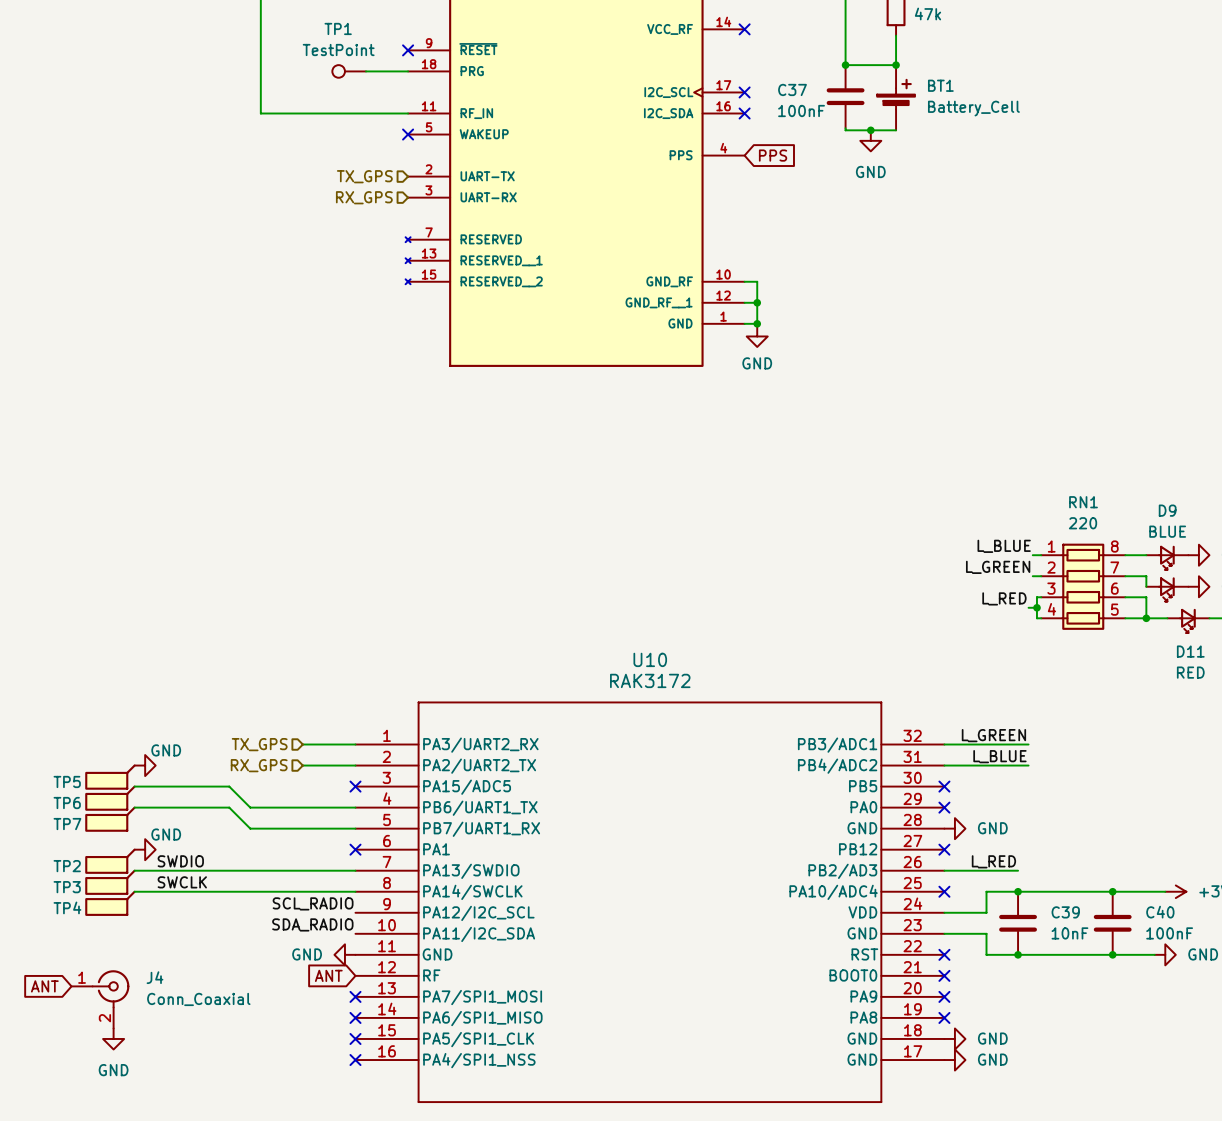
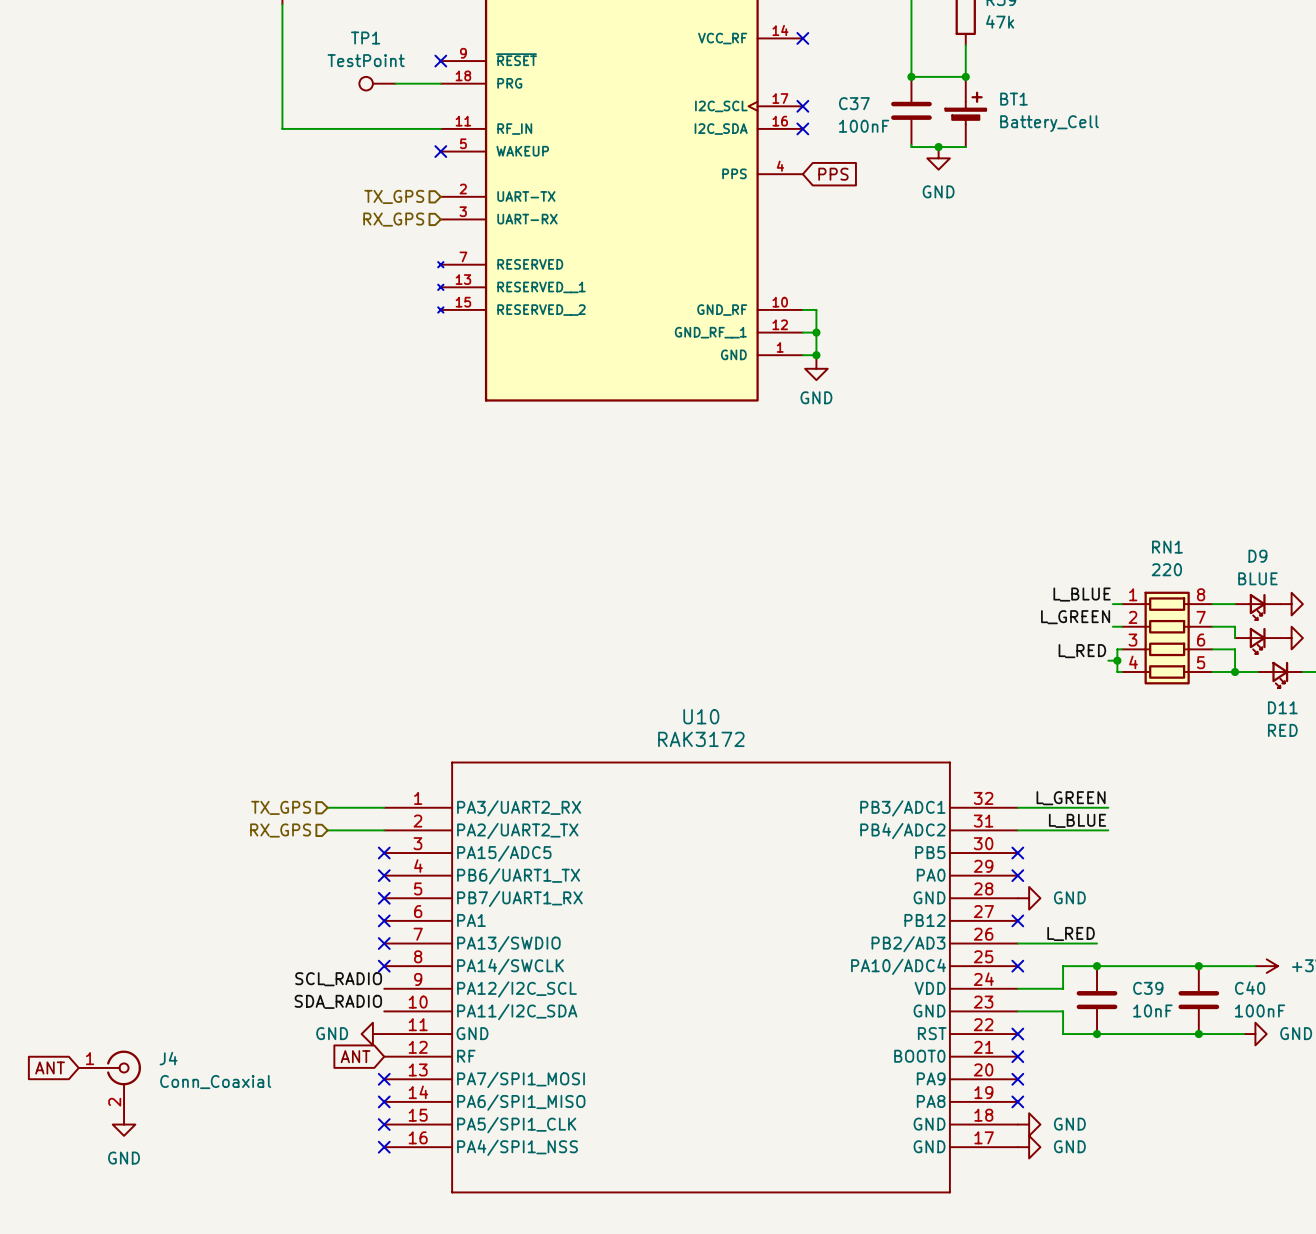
power symbol: GND (145, 765) -> none
TP5: (110, 777) -> none
wire: (134, 786) (229, 786) (250, 807) (355, 807) -> none
TP6: (110, 798) -> none
wire: (134, 807) (229, 807) (250, 828) (355, 828) -> none
no-connect mark: none -> (384, 875)
TP7: (110, 819) -> none
no-connect mark: none -> (384, 898)
power symbol: GND (145, 849) -> none
TP2: (110, 861) -> none
label: SWDIO (180, 861) -> none
wire: (134, 870) (355, 870) -> none
no-connect mark: none -> (384, 943)
TP3: (110, 882) -> none
label: SWCLK (182, 882) -> none
wire: (134, 891) (355, 891) -> none
no-connect mark: none -> (384, 966)
TP4: (110, 903) -> none

